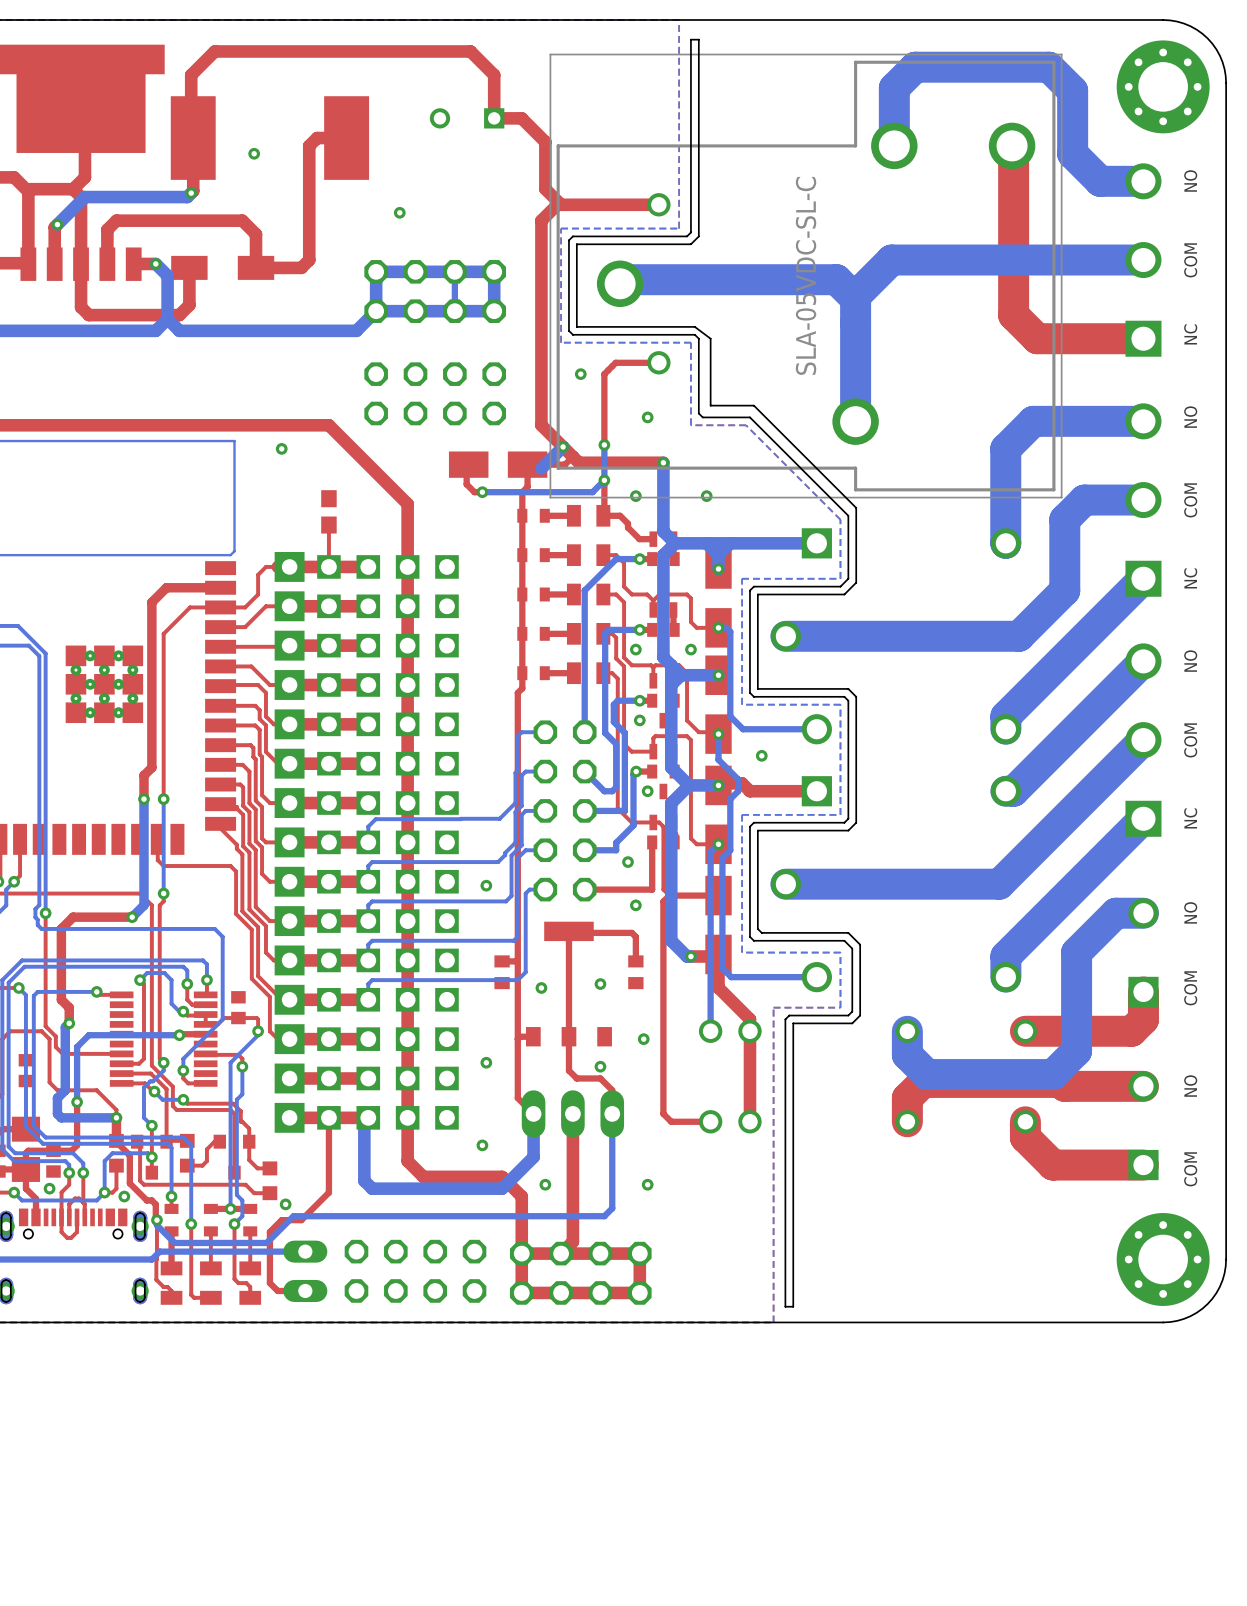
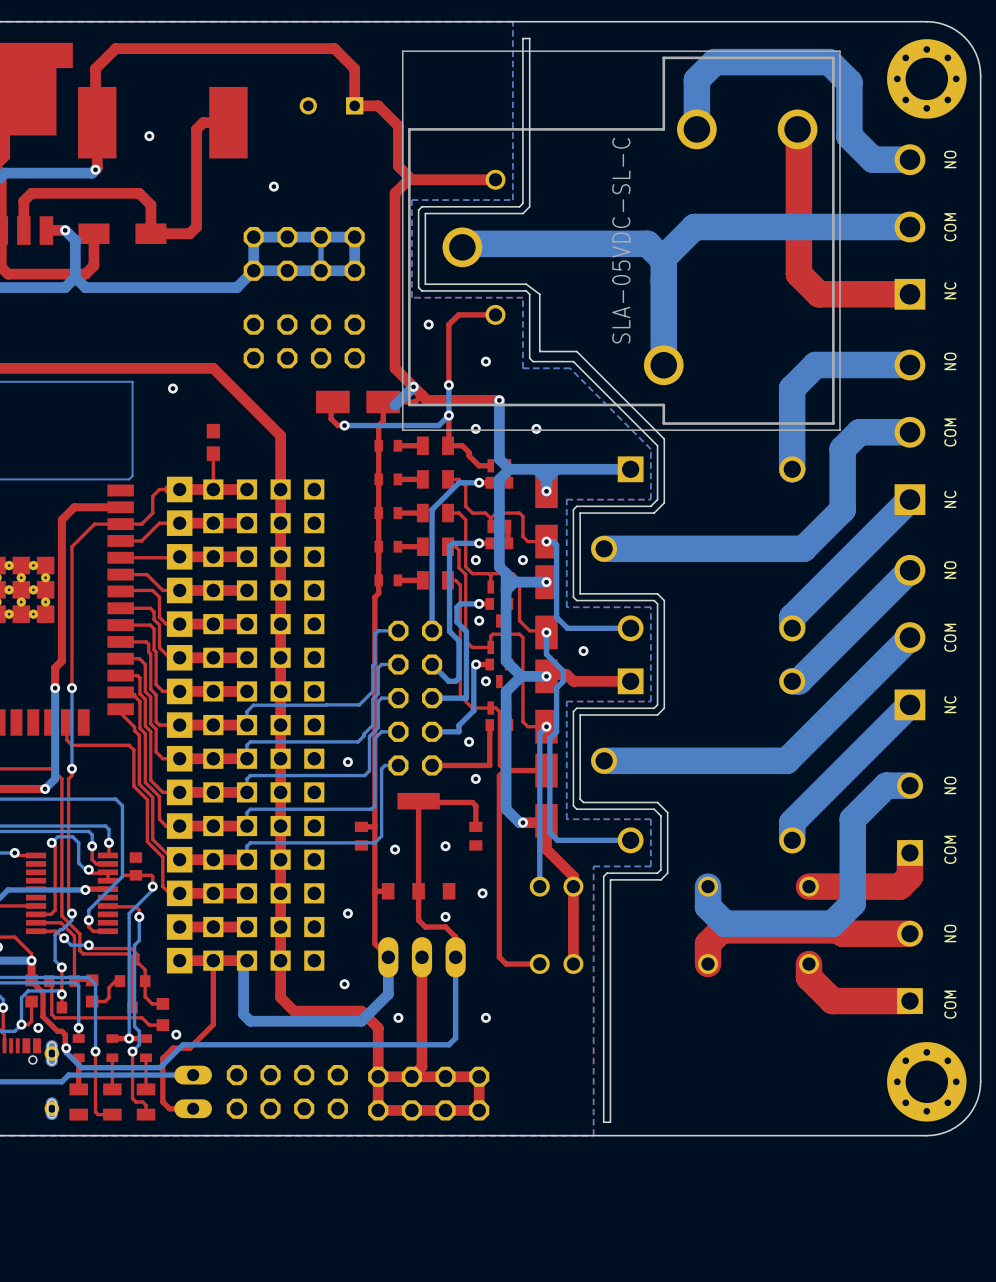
top track: (156, 1220) (156, 1279) (163, 1287) (167, 1287) (171, 1290) (171, 1297) -> none

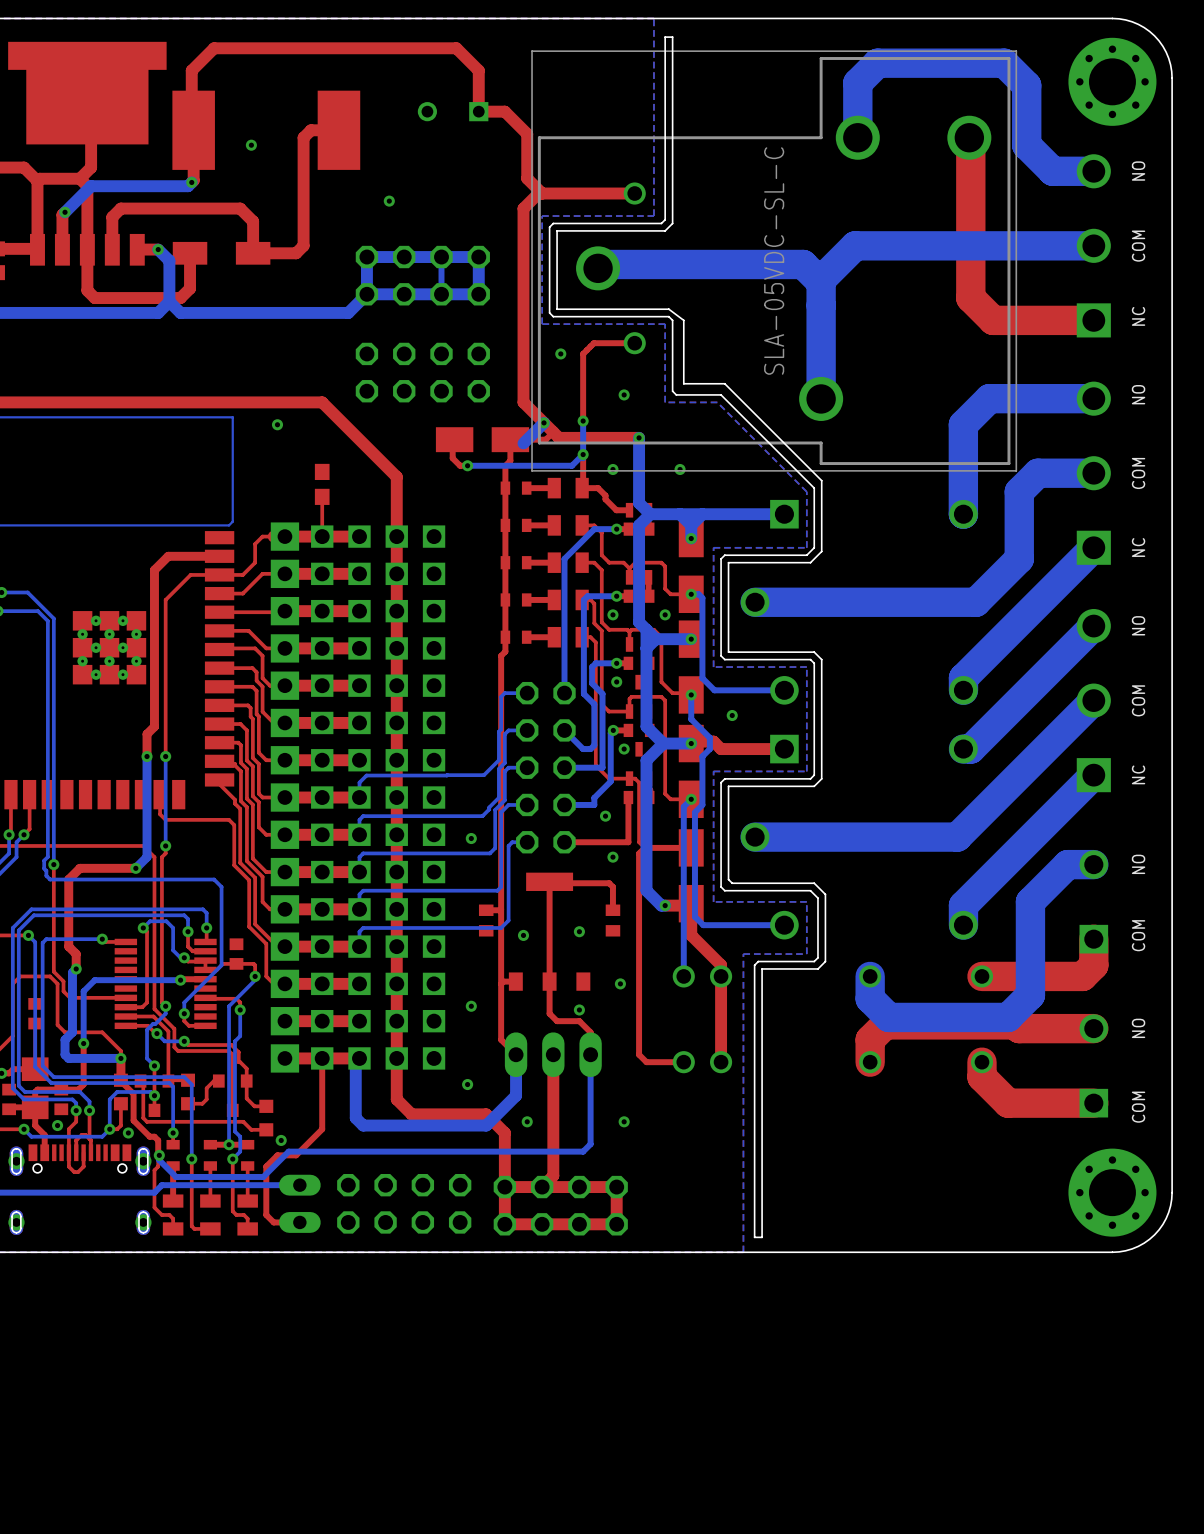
top track: none -> (158, 1155) (158, 1166) (154, 1170) (154, 1207) (161, 1215) (169, 1215) (173, 1218) (173, 1228)

